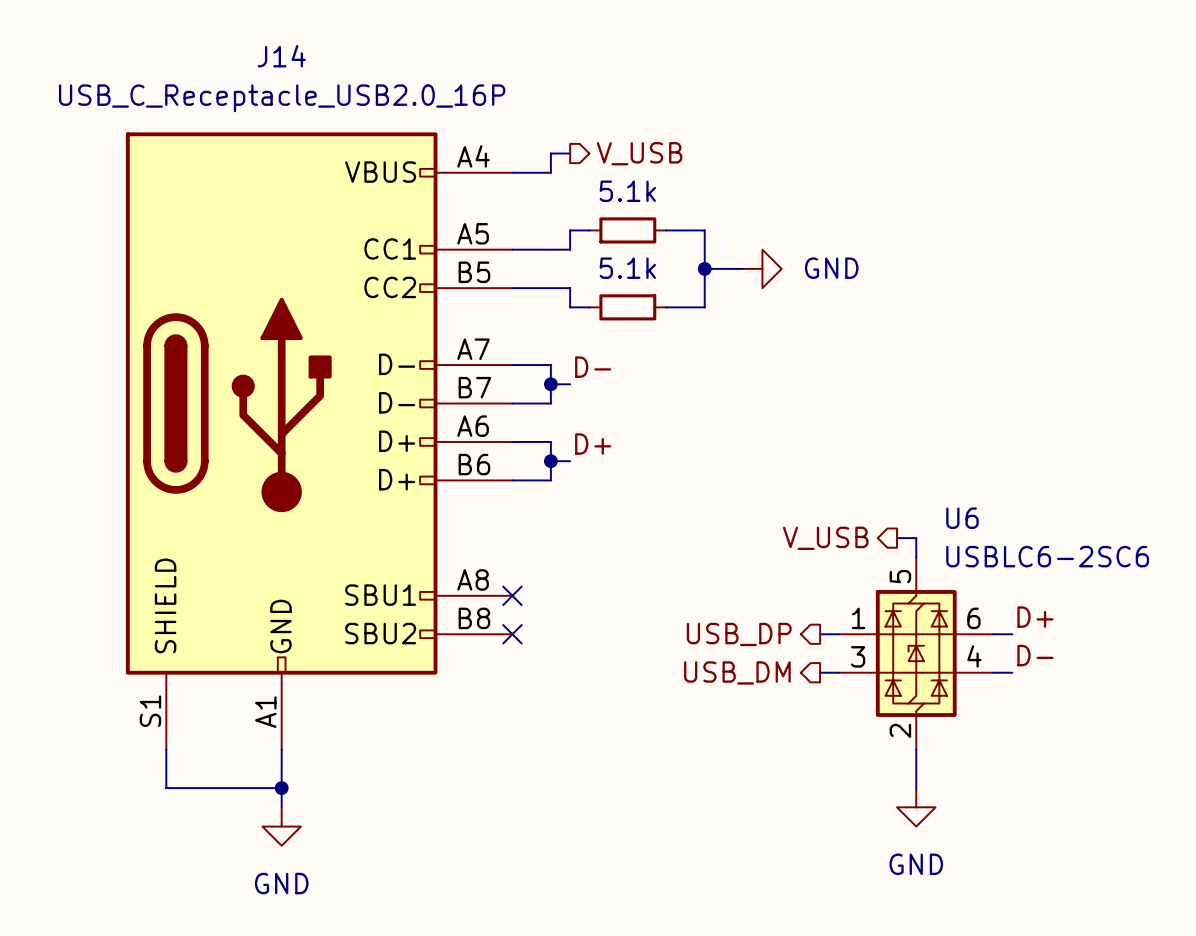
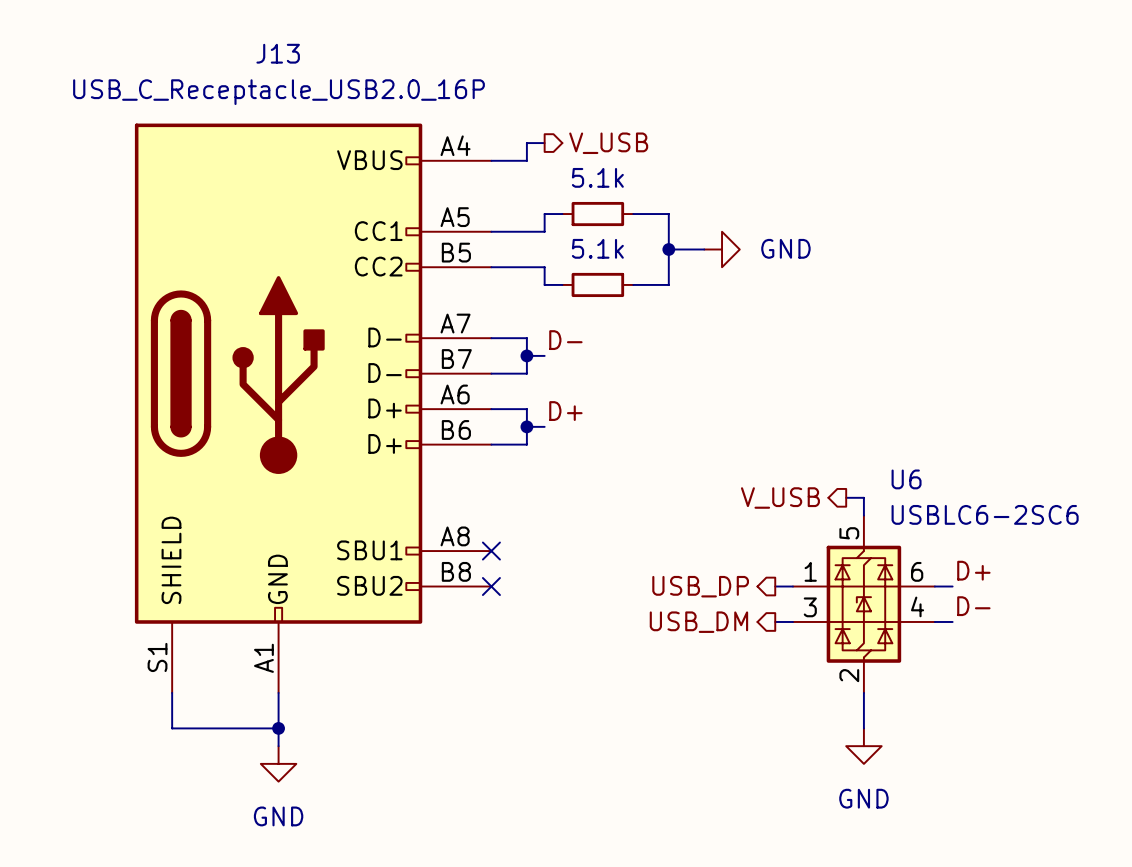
J14 name: J14 (281, 56) -> J13 (278, 53)

